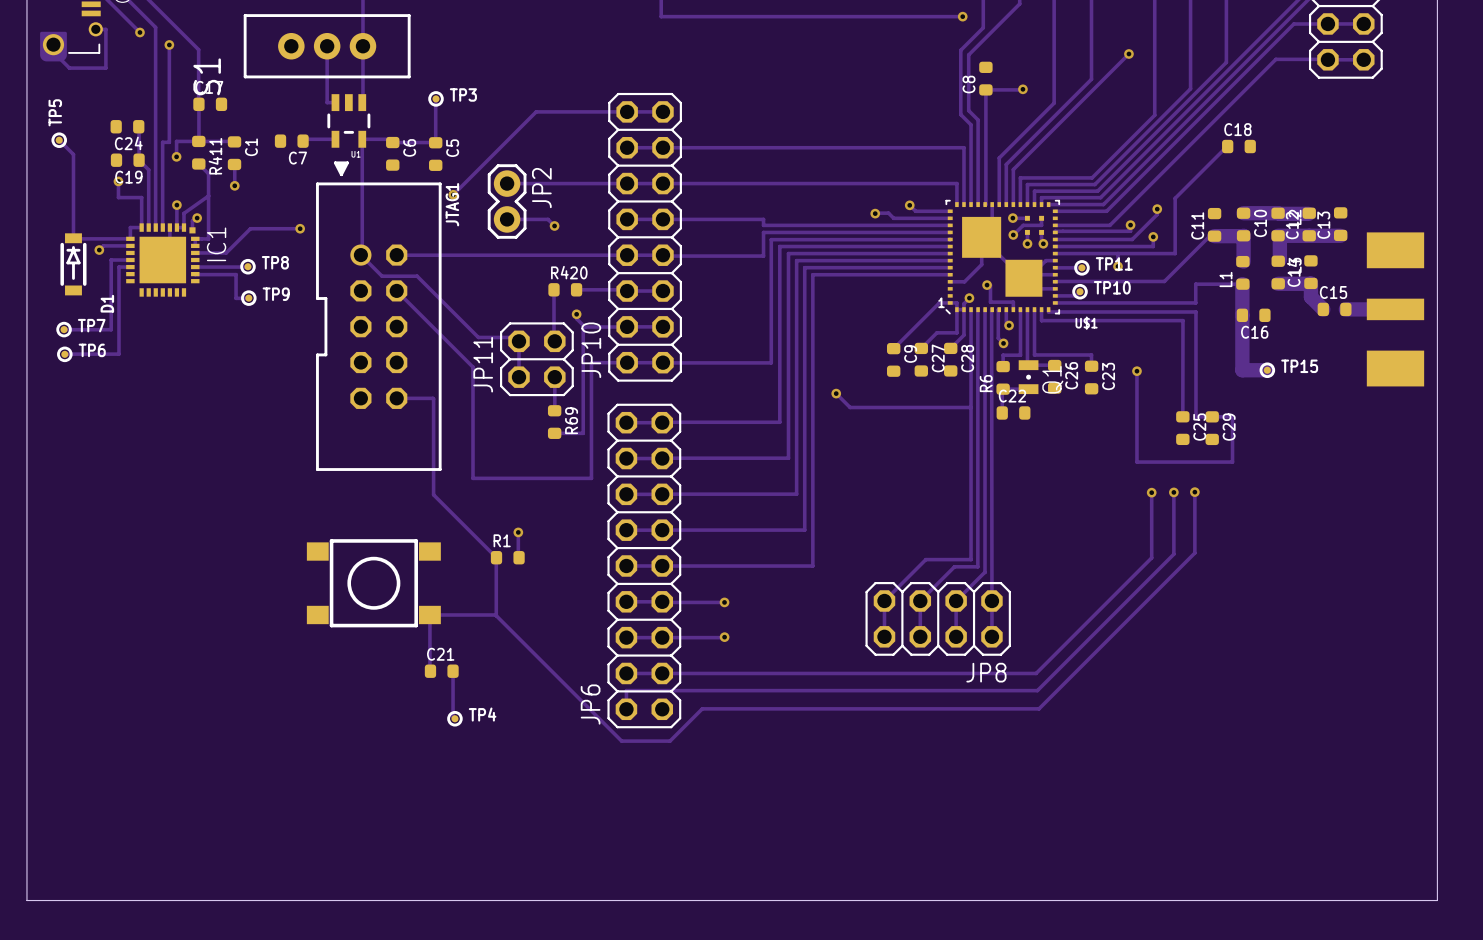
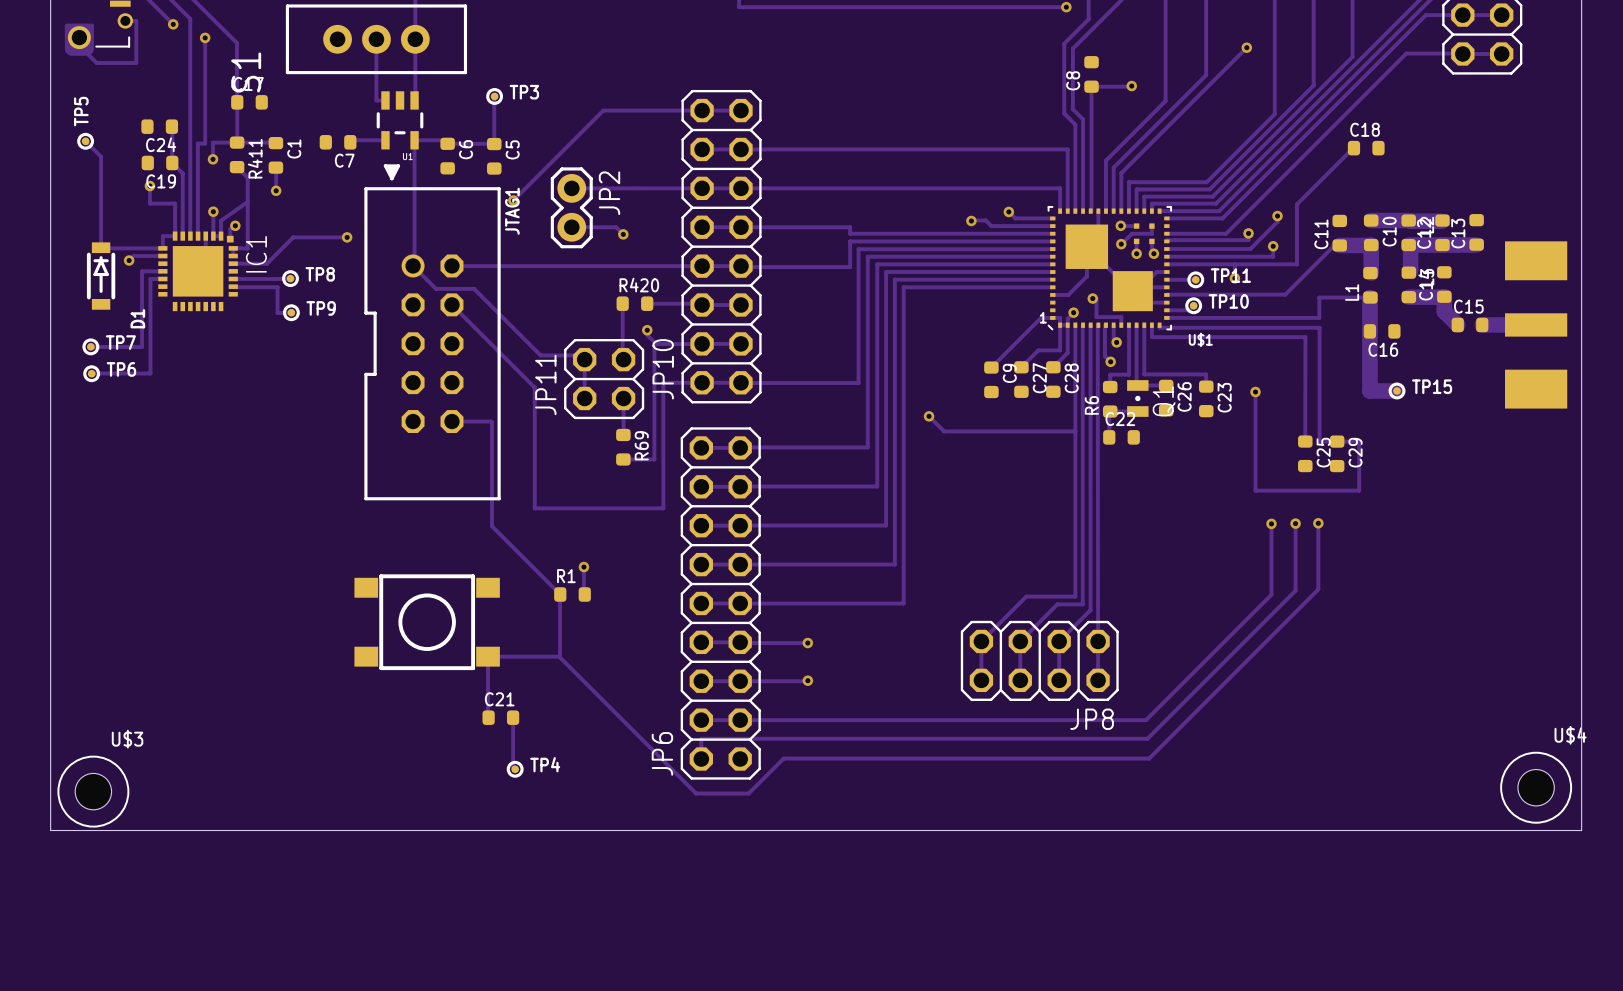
U$4: none -> (1536, 787)
U$3: none -> (93, 791)
board edge: (26, 775) (26, 900) (1437, 900) (1437, 775) -> (50, 830) (1581, 830)

